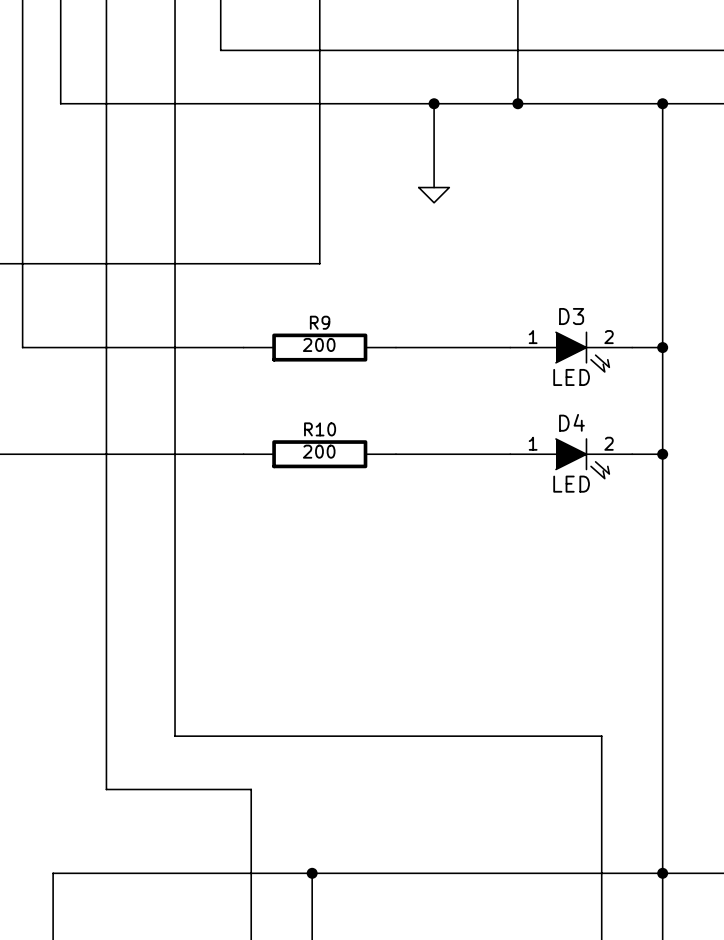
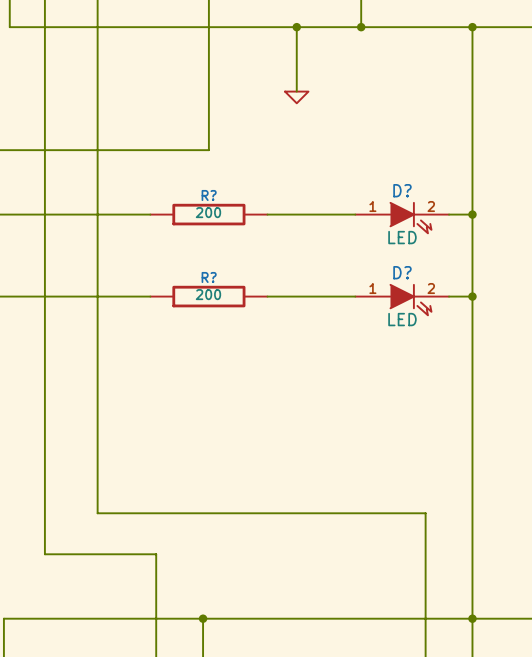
D3 name: D3 (571, 316) -> D? (402, 190)
R9 name: R9 (320, 322) -> R? (209, 195)
D4 name: D4 (571, 422) -> D? (402, 272)
R10 name: R10 (320, 429) -> R? (209, 277)

